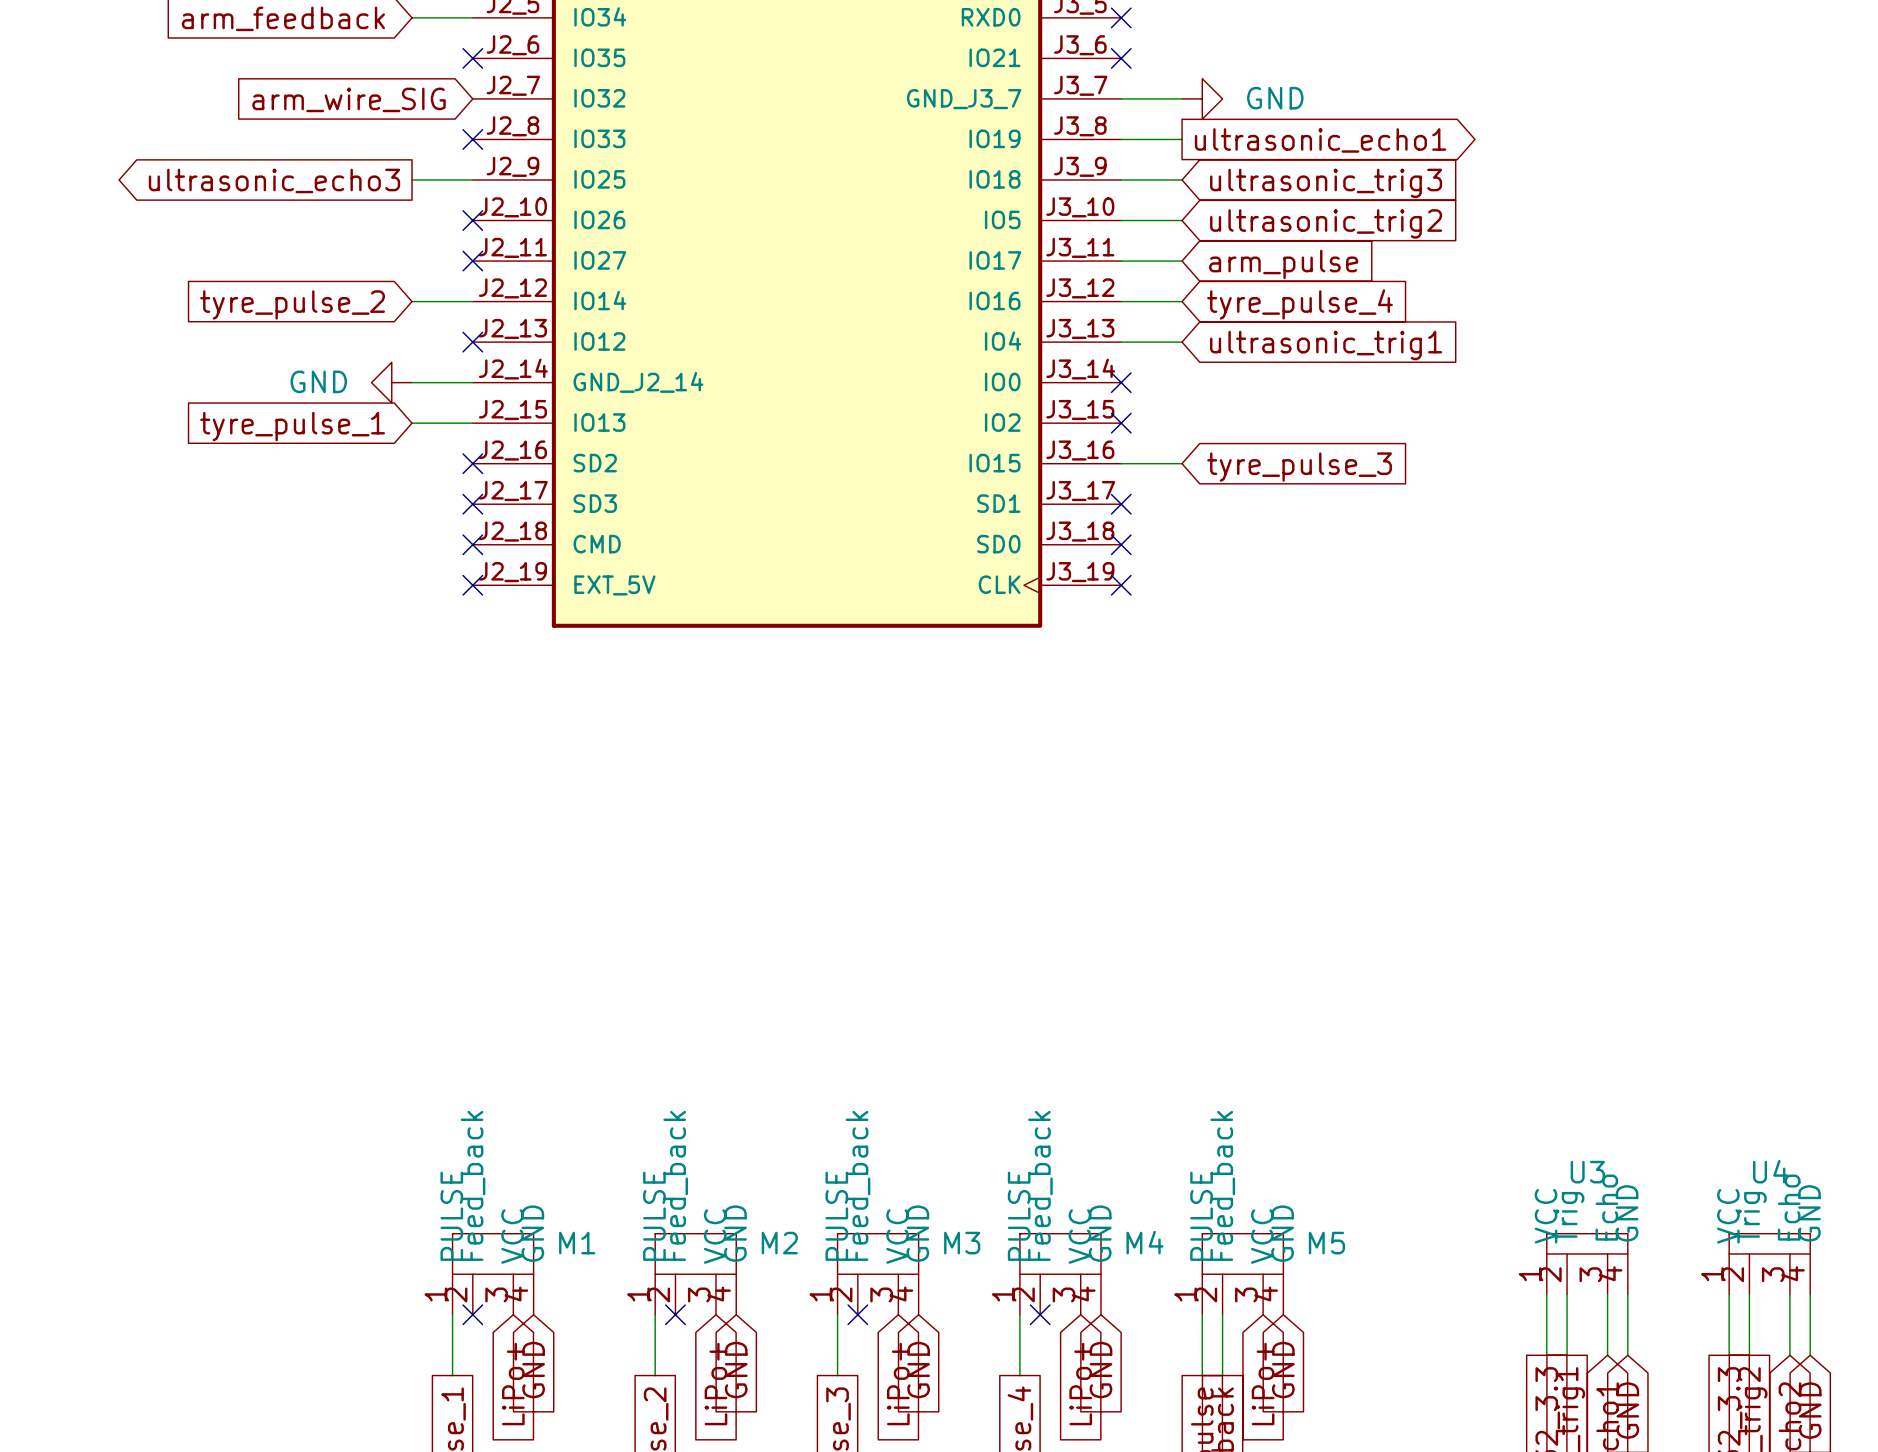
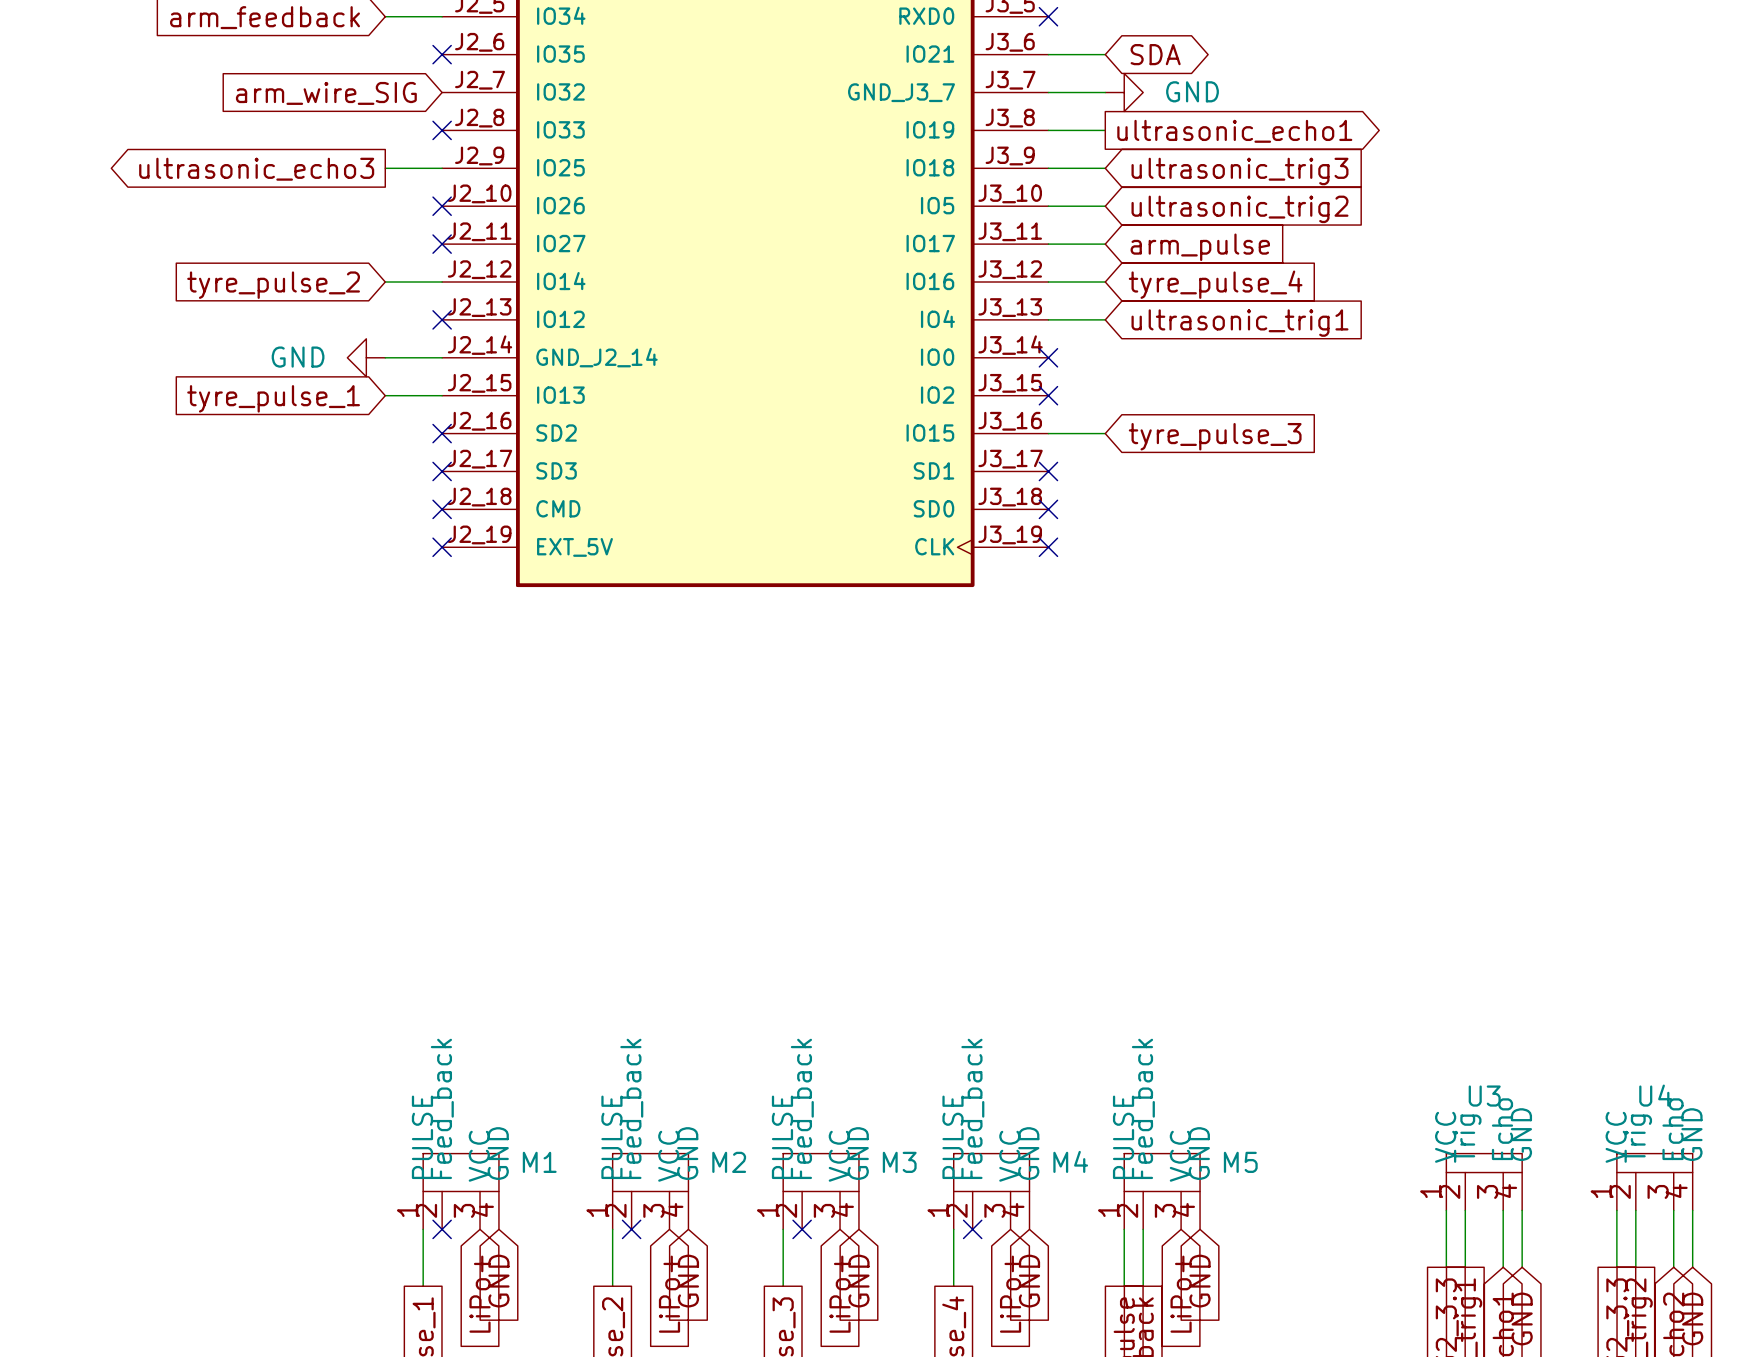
wire: none -> (1048, 54) (1105, 54)
no-connect mark: (1121, 58) -> none
global label: none -> SDA (1155, 54)

